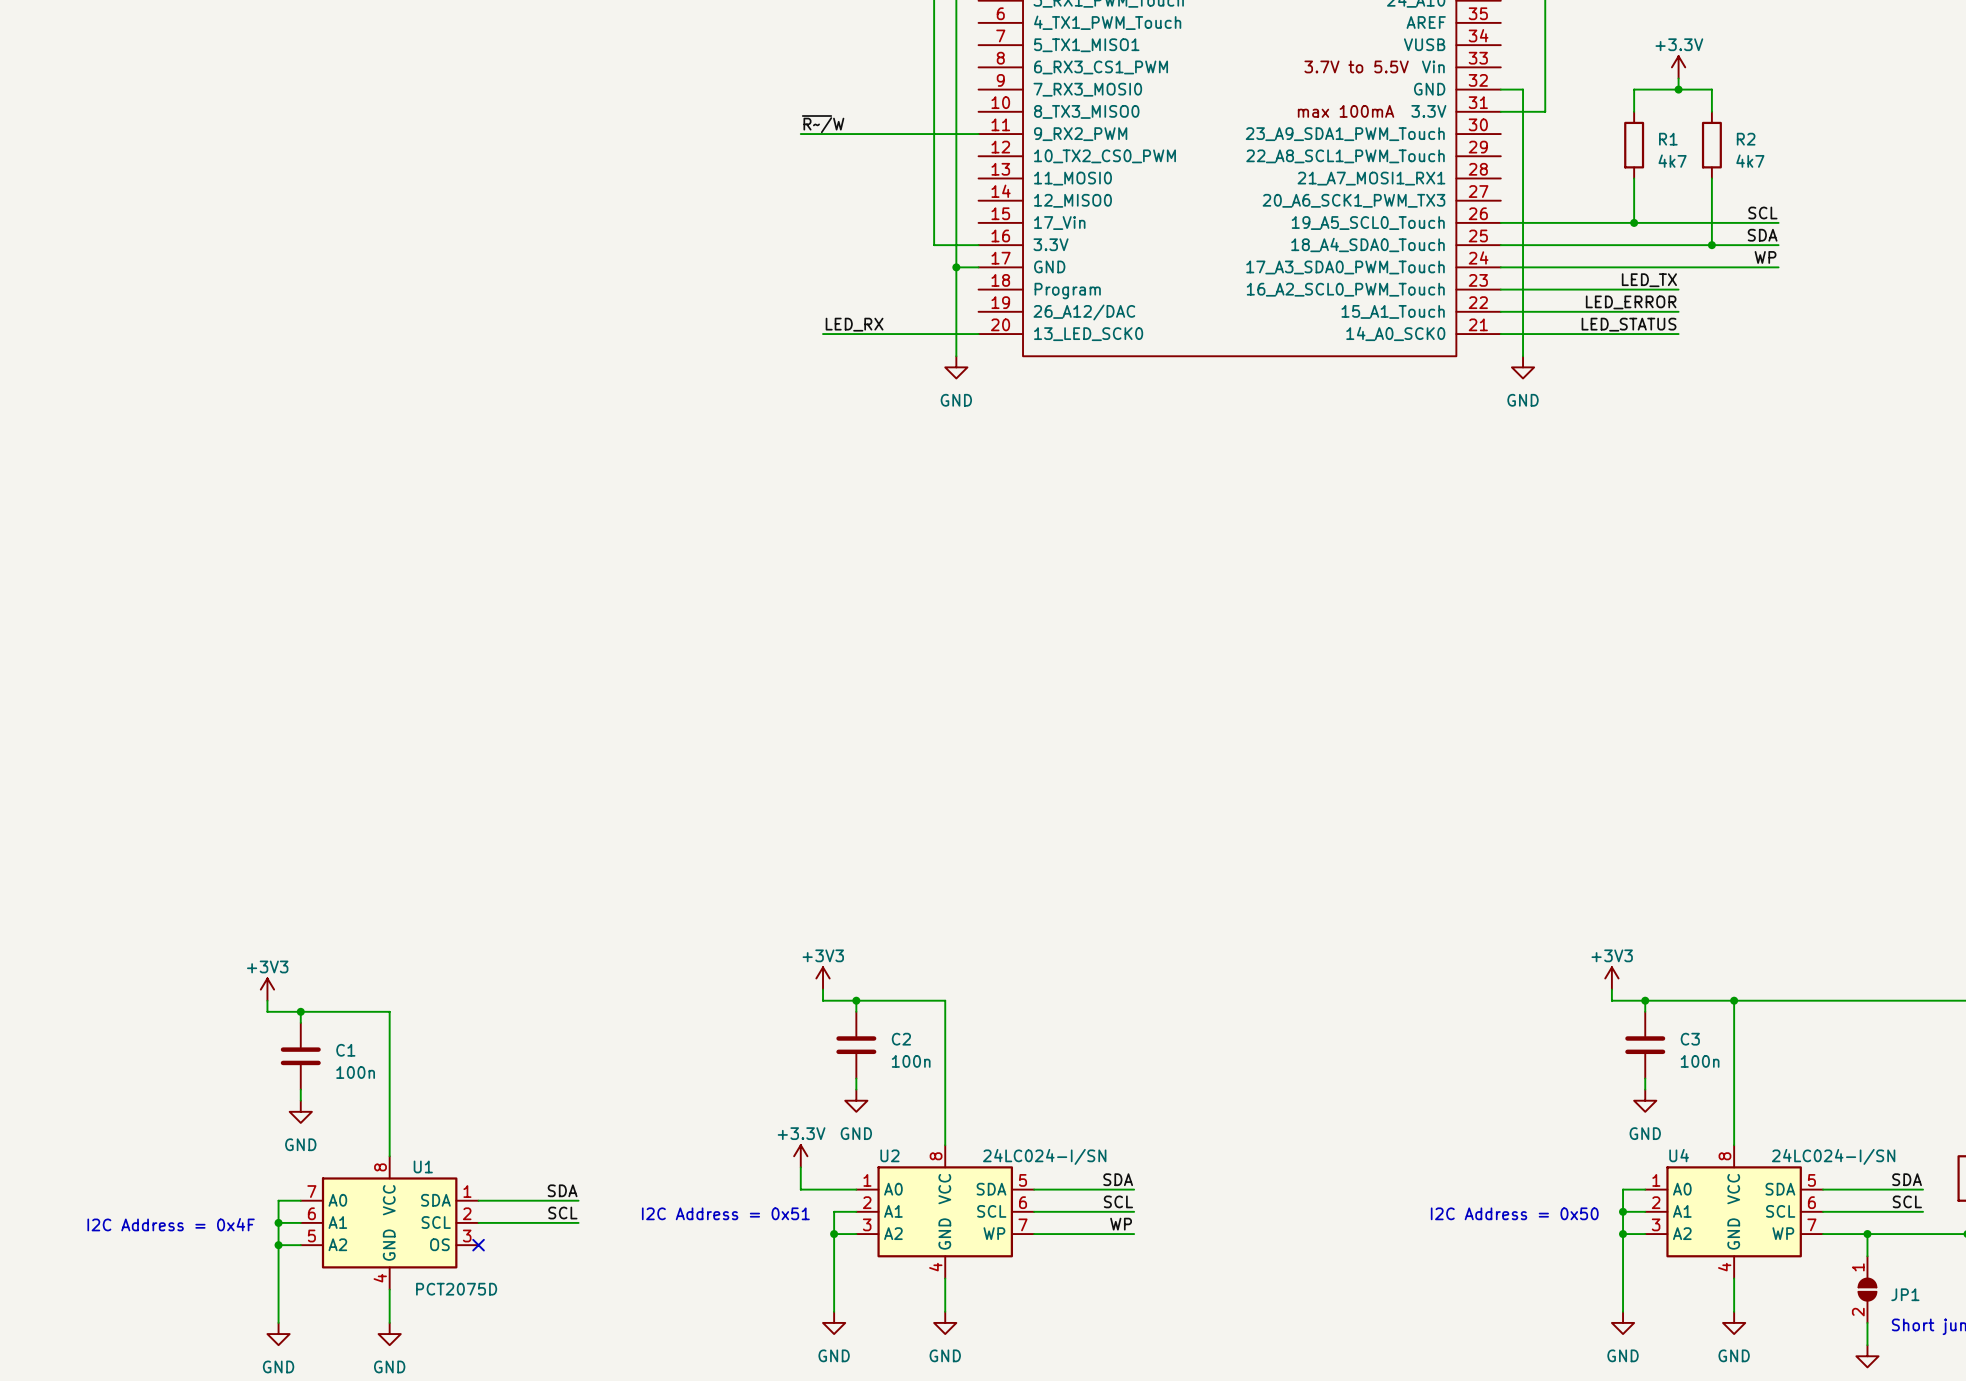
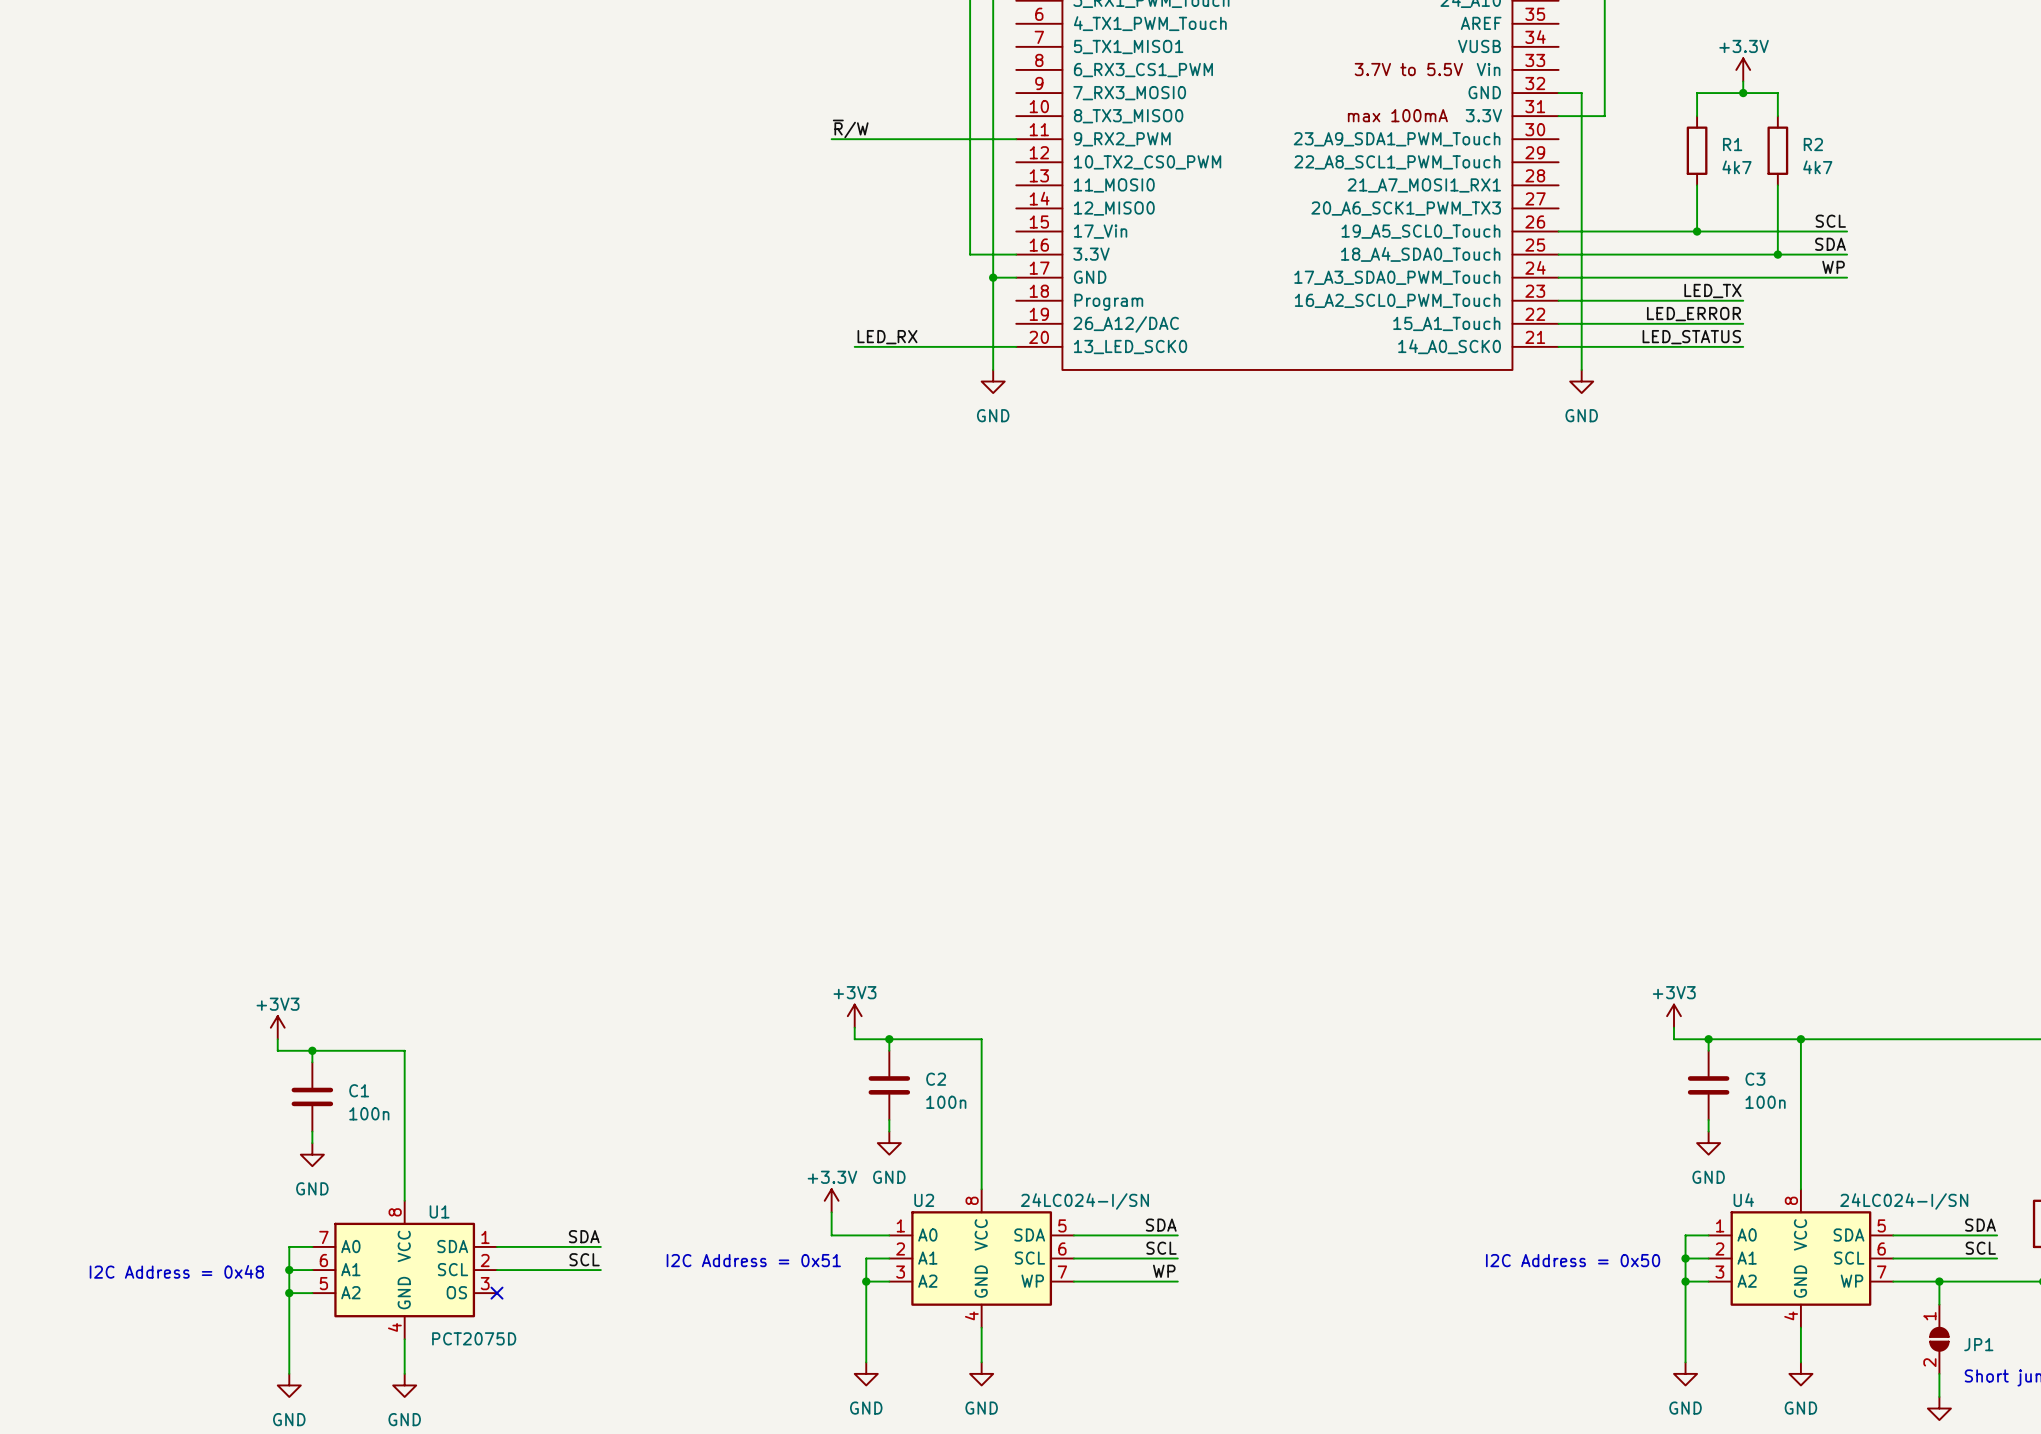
label: ~{R~/}W (823, 124) -> ~{R}/W (850, 128)
text: I2C Address = 0x4F (171, 1224) -> I2C Address = 0x48 (176, 1271)

